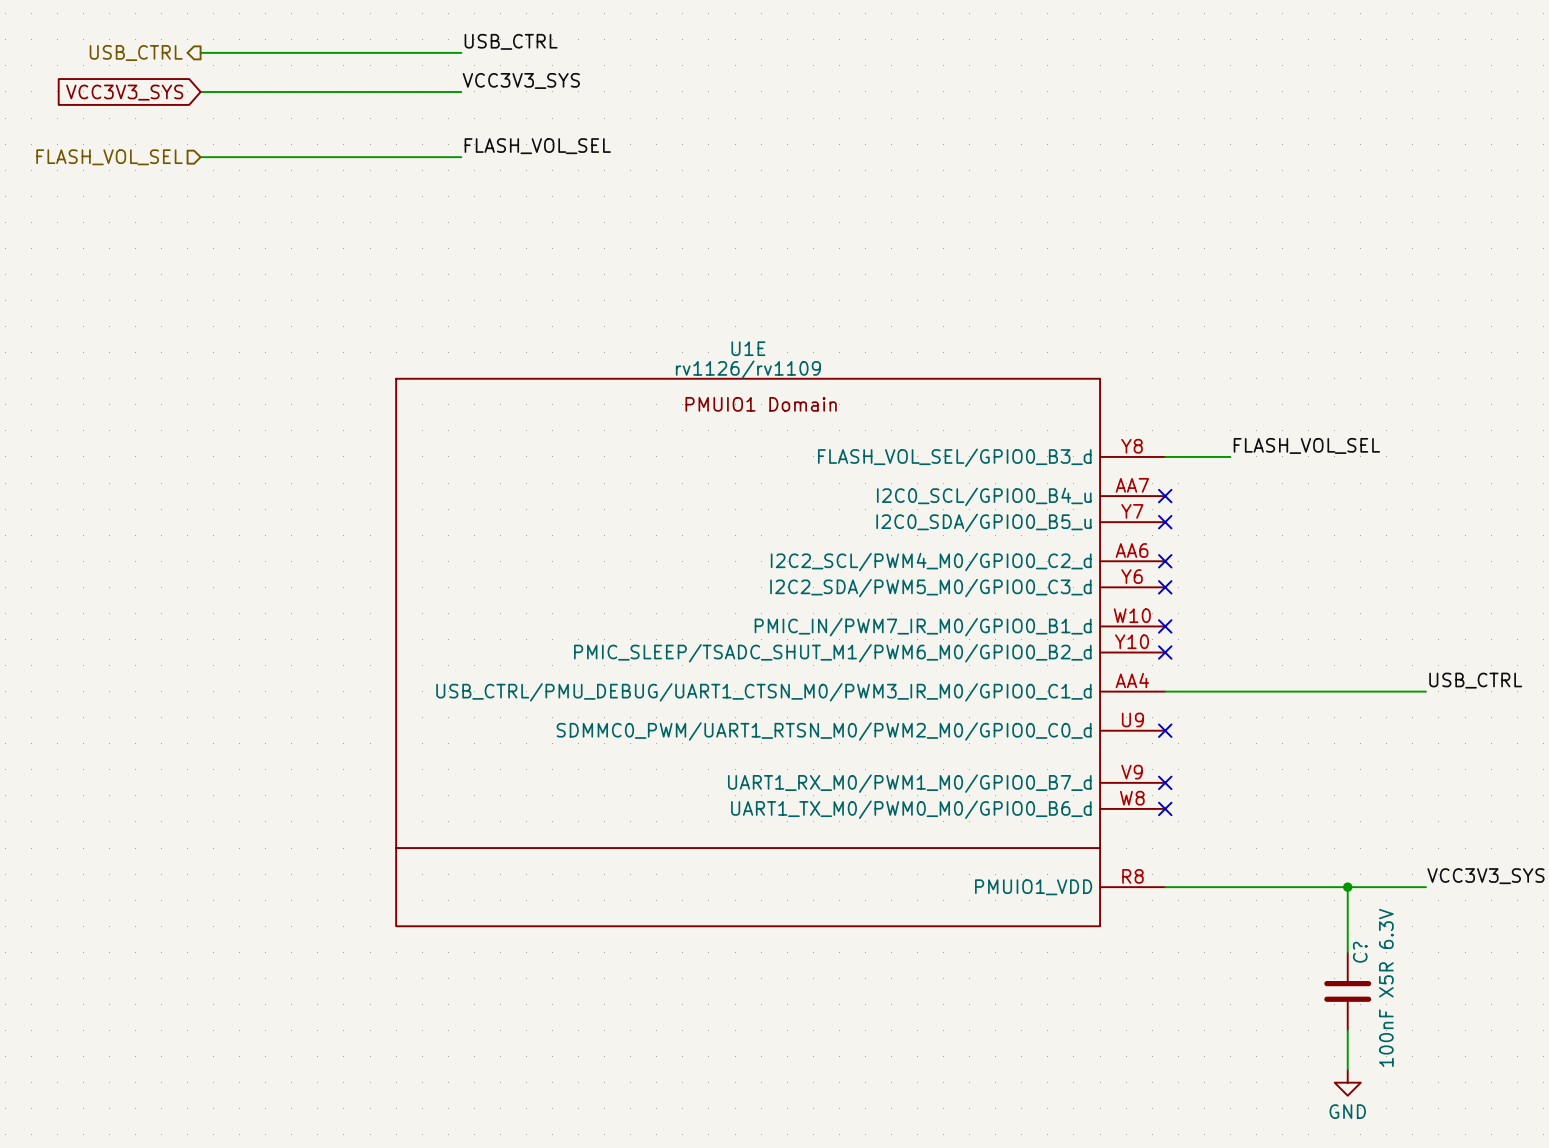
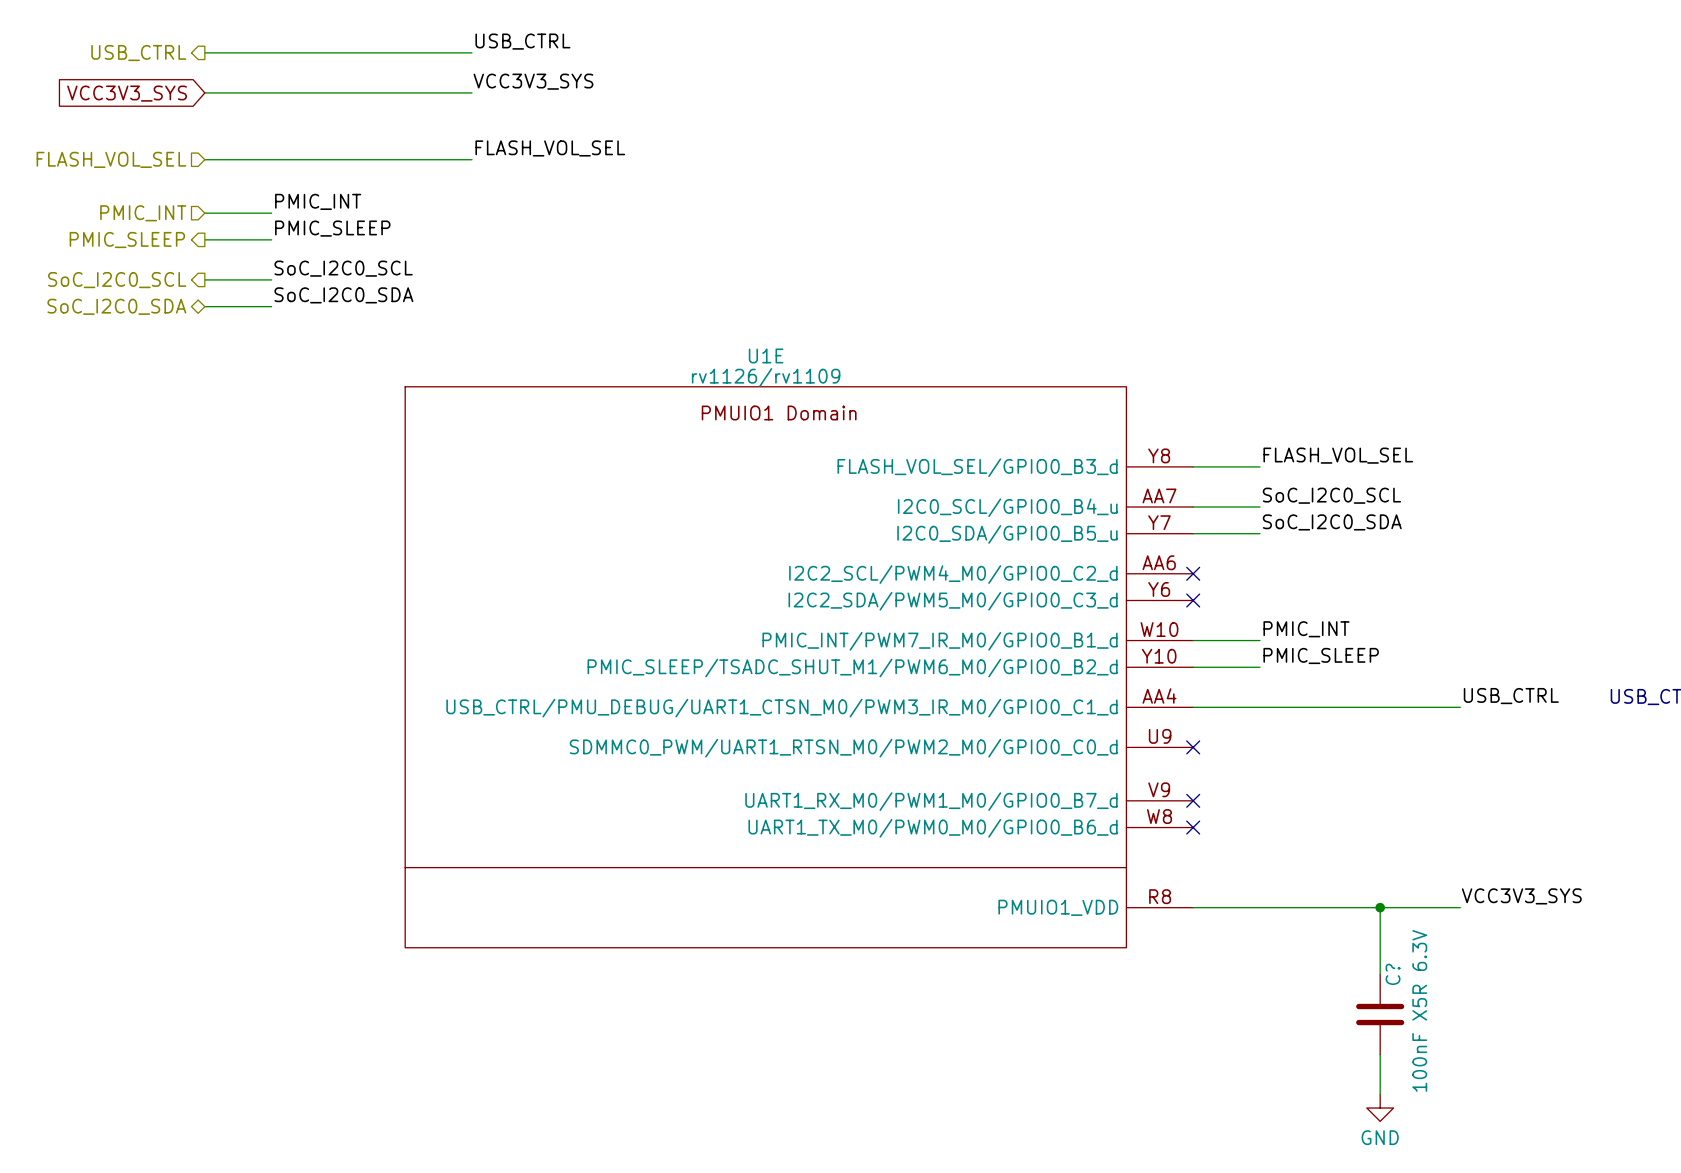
label: none -> PMIC_INT (318, 201)
hierarchical label: none -> PMIC_INT (143, 213)
wire: none -> (204, 213) (271, 213)
label: none -> PMIC_SLEEP (332, 228)
hierarchical label: none -> PMIC_SLEEP (127, 240)
wire: none -> (204, 239) (271, 239)
label: none -> SoC_I2C0_SCL (343, 268)
hierarchical label: none -> SoC_I2C0_SCL (117, 280)
wire: none -> (204, 279) (271, 279)
label: none -> SoC_I2C0_SDA (343, 295)
hierarchical label: none -> SoC_I2C0_SDA (116, 306)
wire: none -> (204, 306) (271, 306)
label: none -> SoC_I2C0_SCL (1331, 495)
wire: none -> (1193, 506) (1259, 506)
no-connect mark: (1165, 496) -> none
label: none -> SoC_I2C0_SDA (1332, 522)
wire: none -> (1193, 533) (1259, 533)
no-connect mark: (1165, 522) -> none
label: none -> PMIC_INT (1306, 629)
wire: none -> (1193, 640) (1259, 640)
no-connect mark: (1165, 626) -> none
U1E pin name: PMIC_IN/PWM7_IR_M0/GPIO0_B1_d (923, 627) -> PMIC_INT/PWM7_IR_M0/GPIO0_B1_d (940, 641)
label: none -> PMIC_SLEEP (1321, 655)
wire: none -> (1193, 667) (1259, 667)
no-connect mark: (1165, 652) -> none

